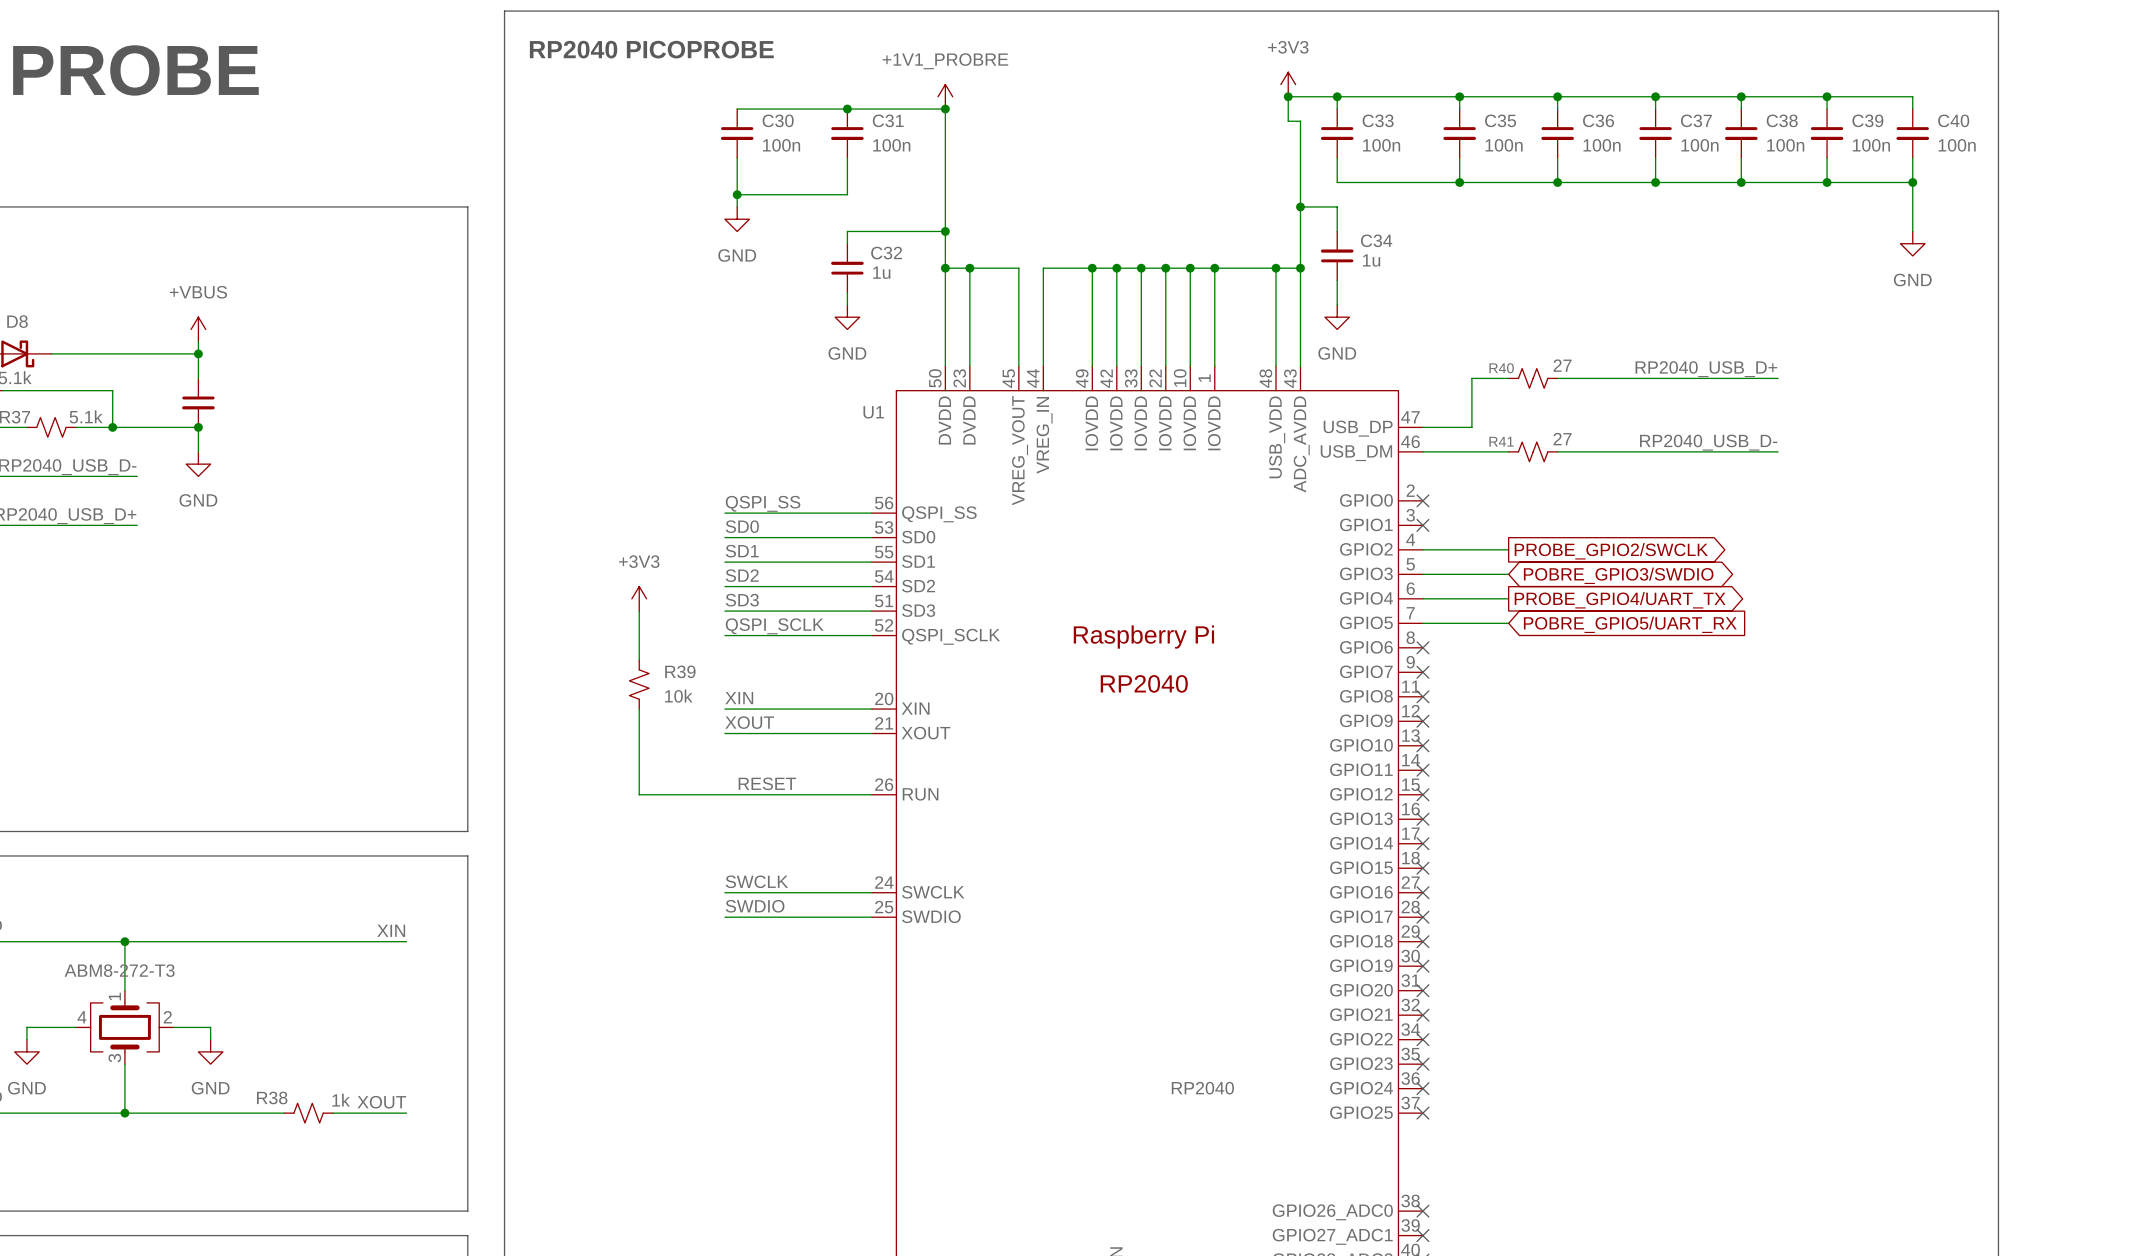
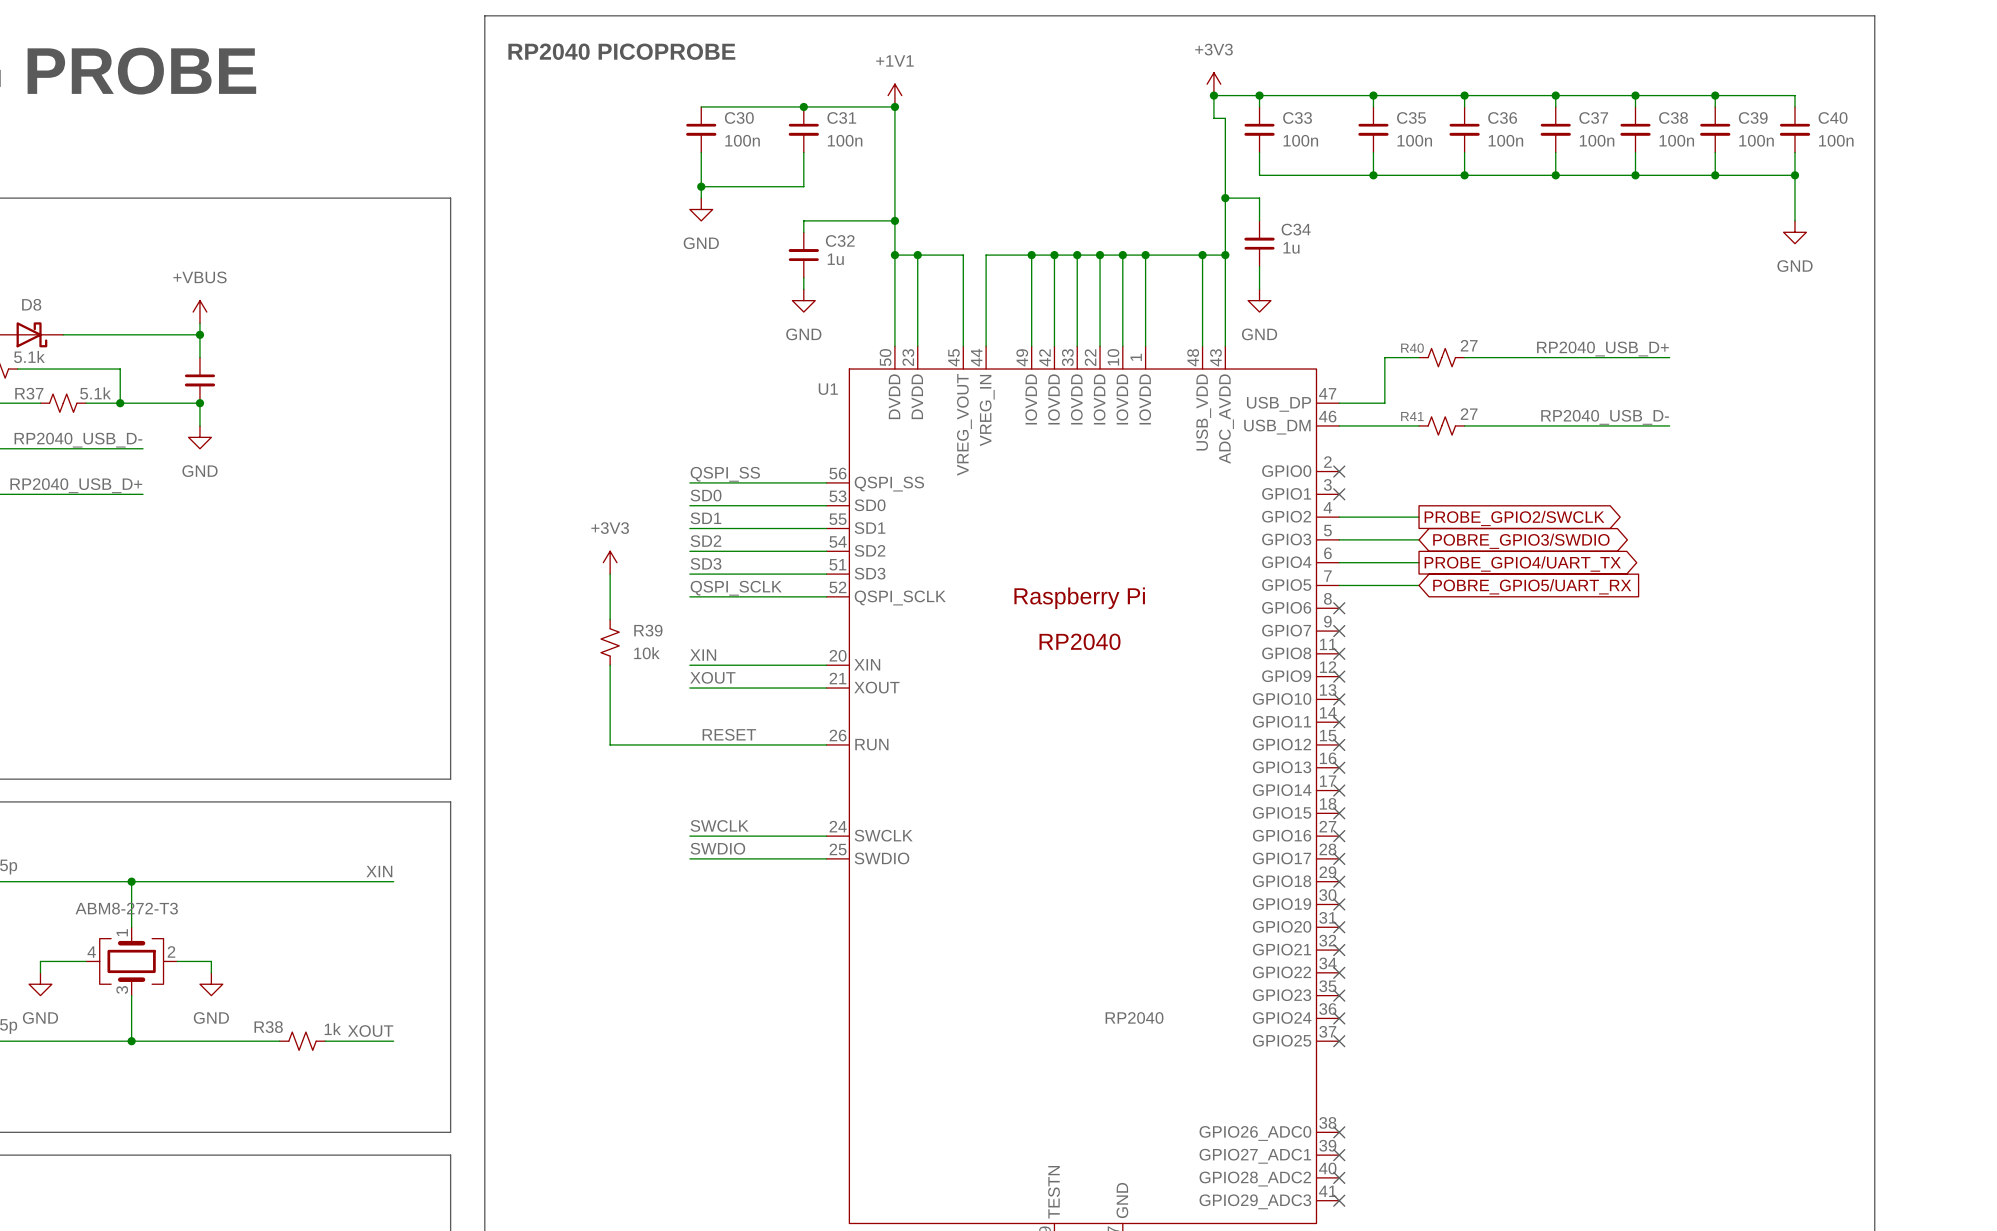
power symbol: +1V1_PROBRE (945, 96) -> +1V1 (894, 95)

